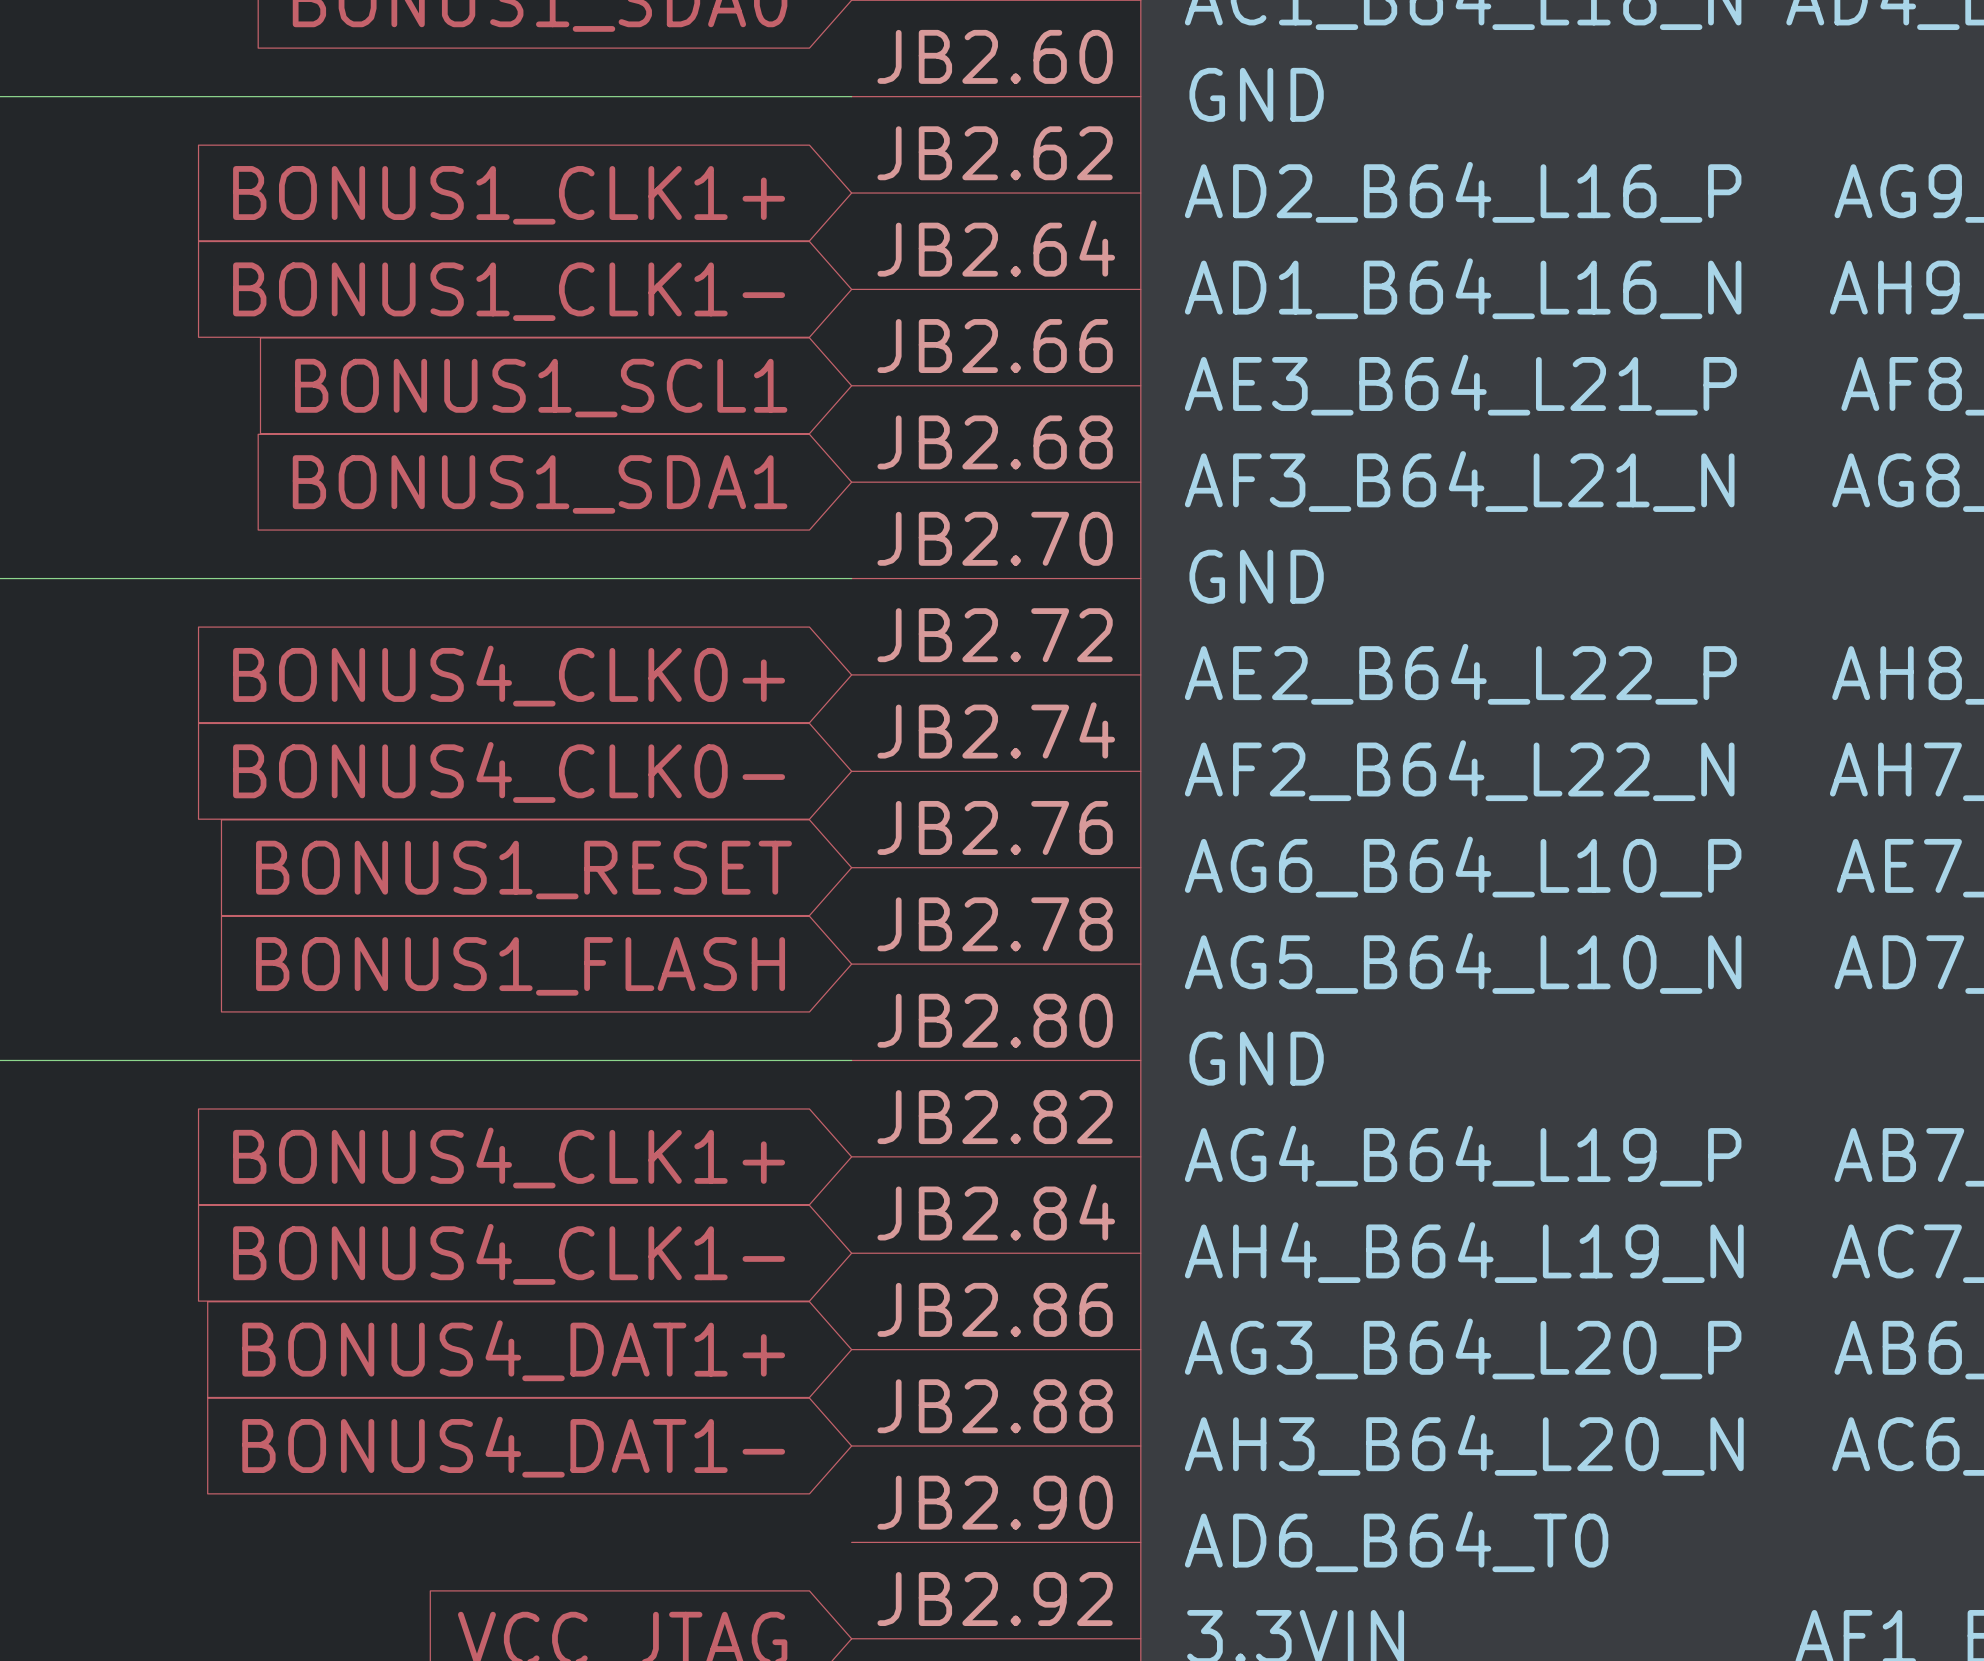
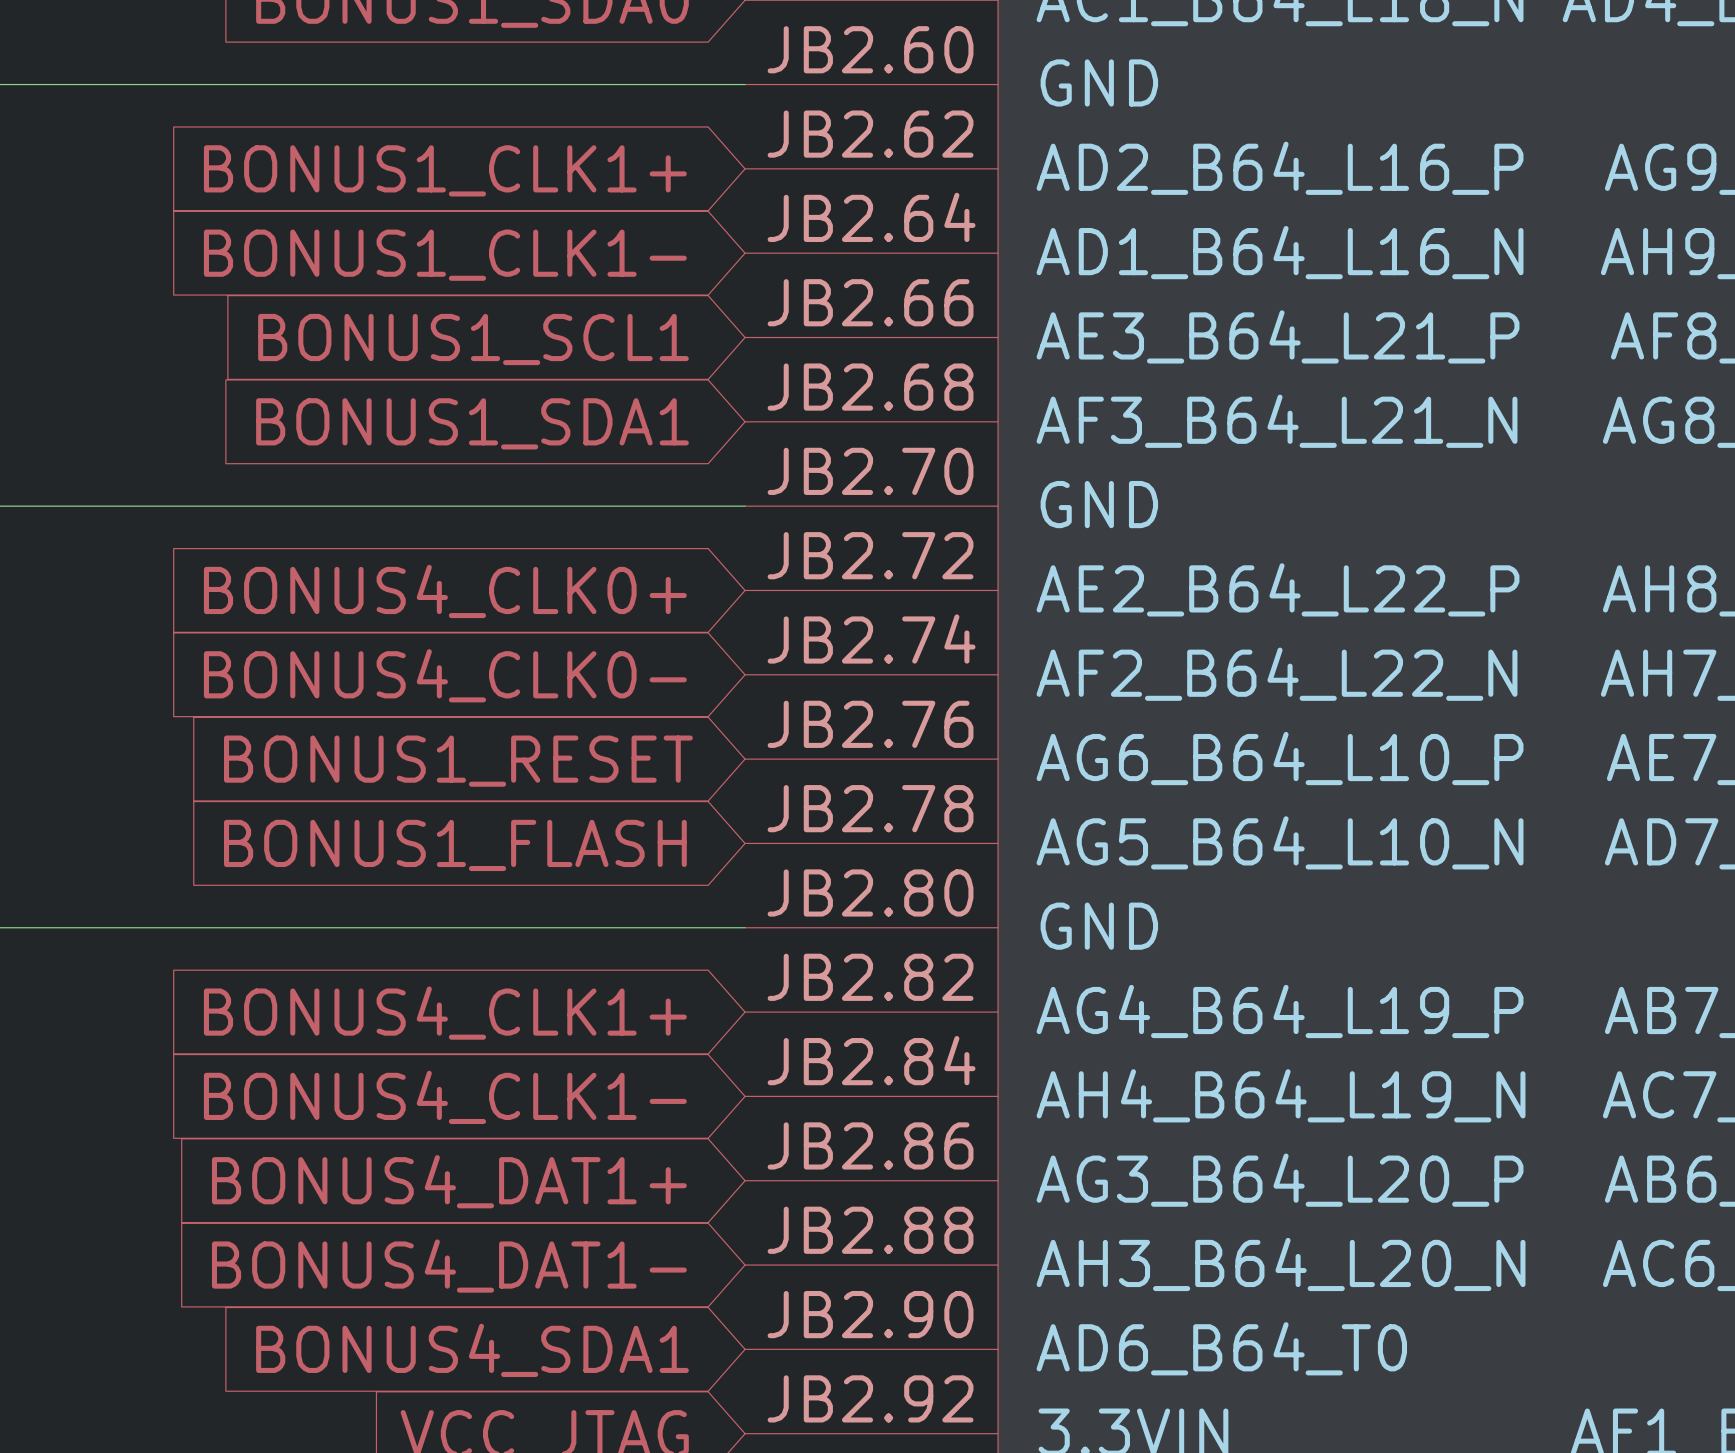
global label: none -> BONUS4_SDA1 (472, 1350)

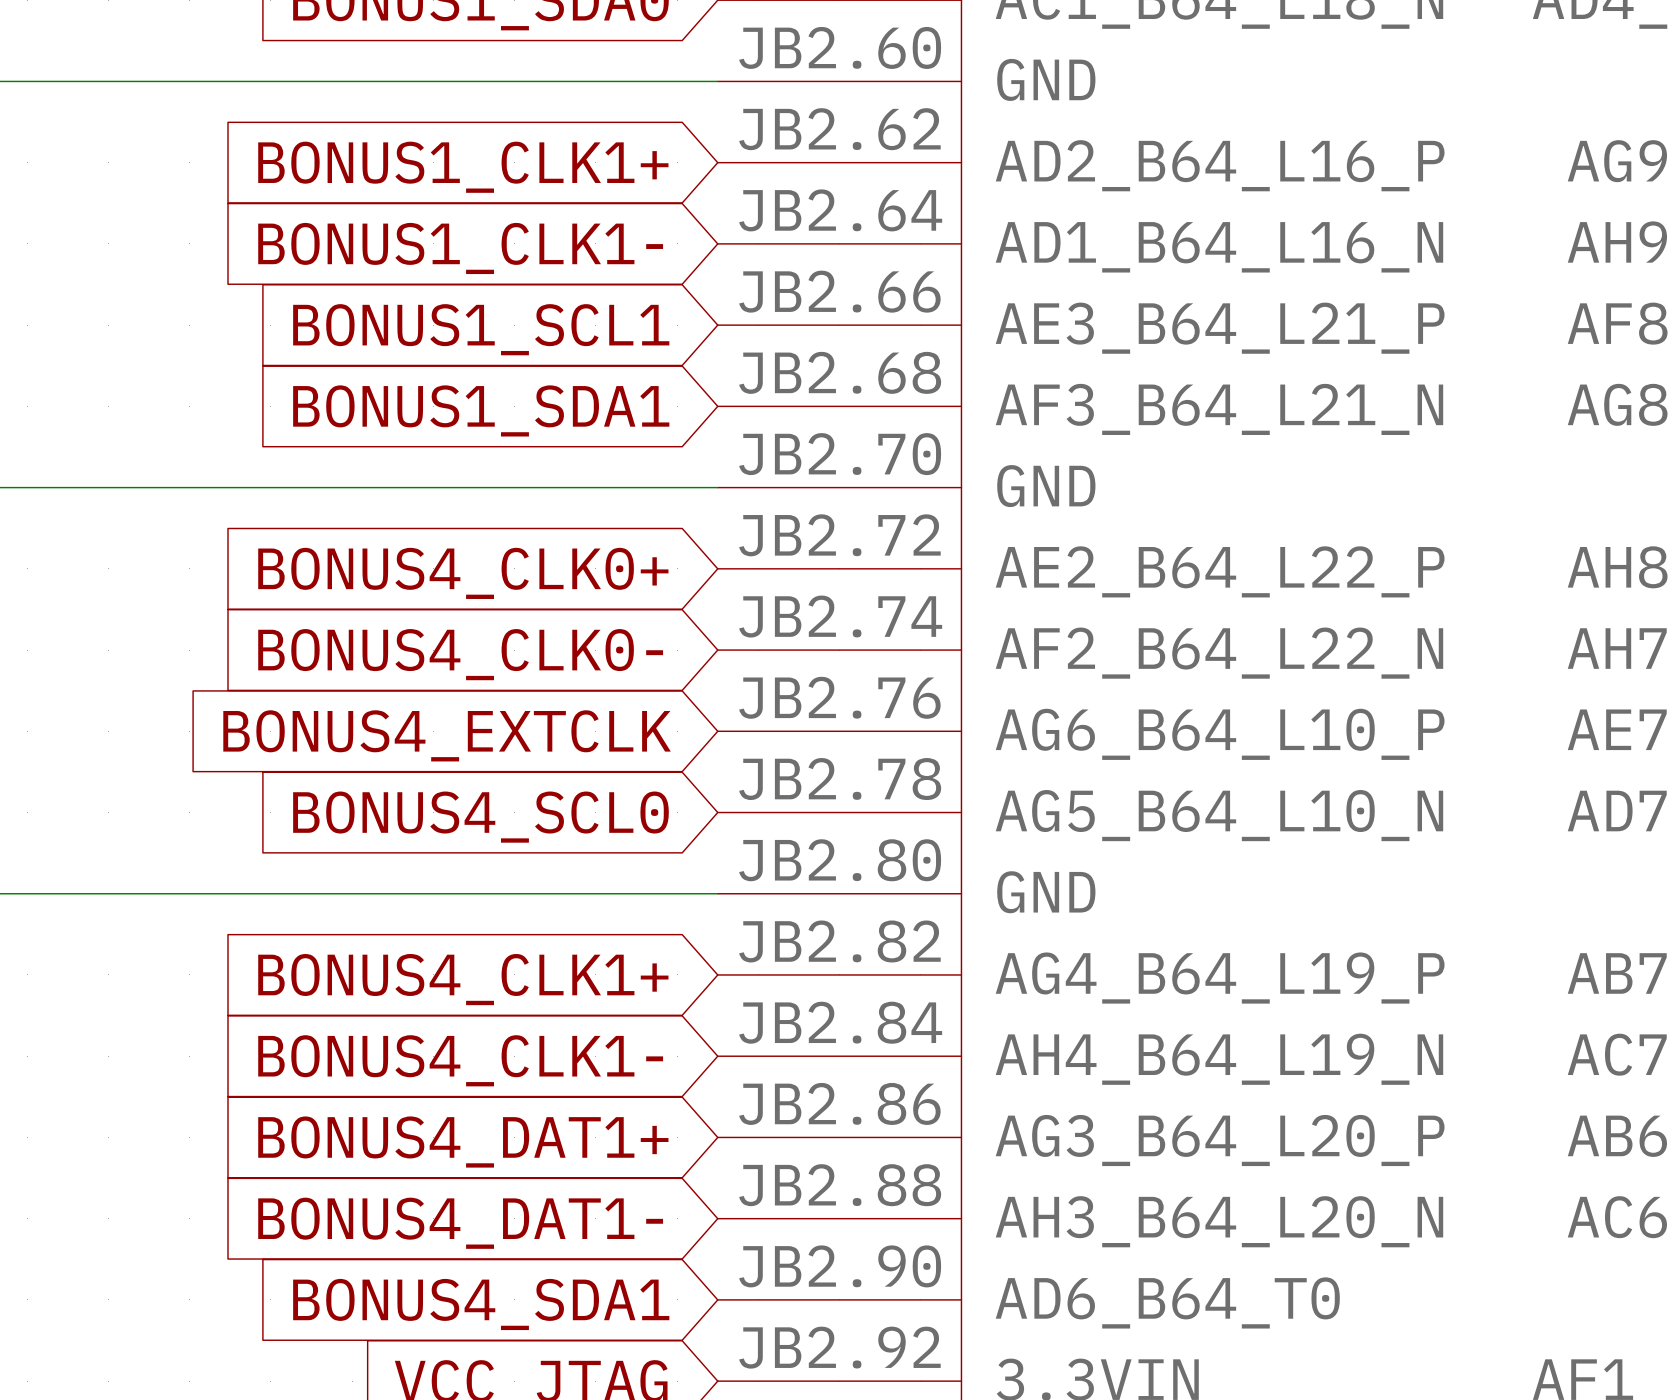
global label: BONUS1_RESET (458, 761) -> BONUS4_EXTCLK (447, 735)
global label: BONUS1_FLASH (455, 845) -> BONUS4_SCL0 (480, 817)

